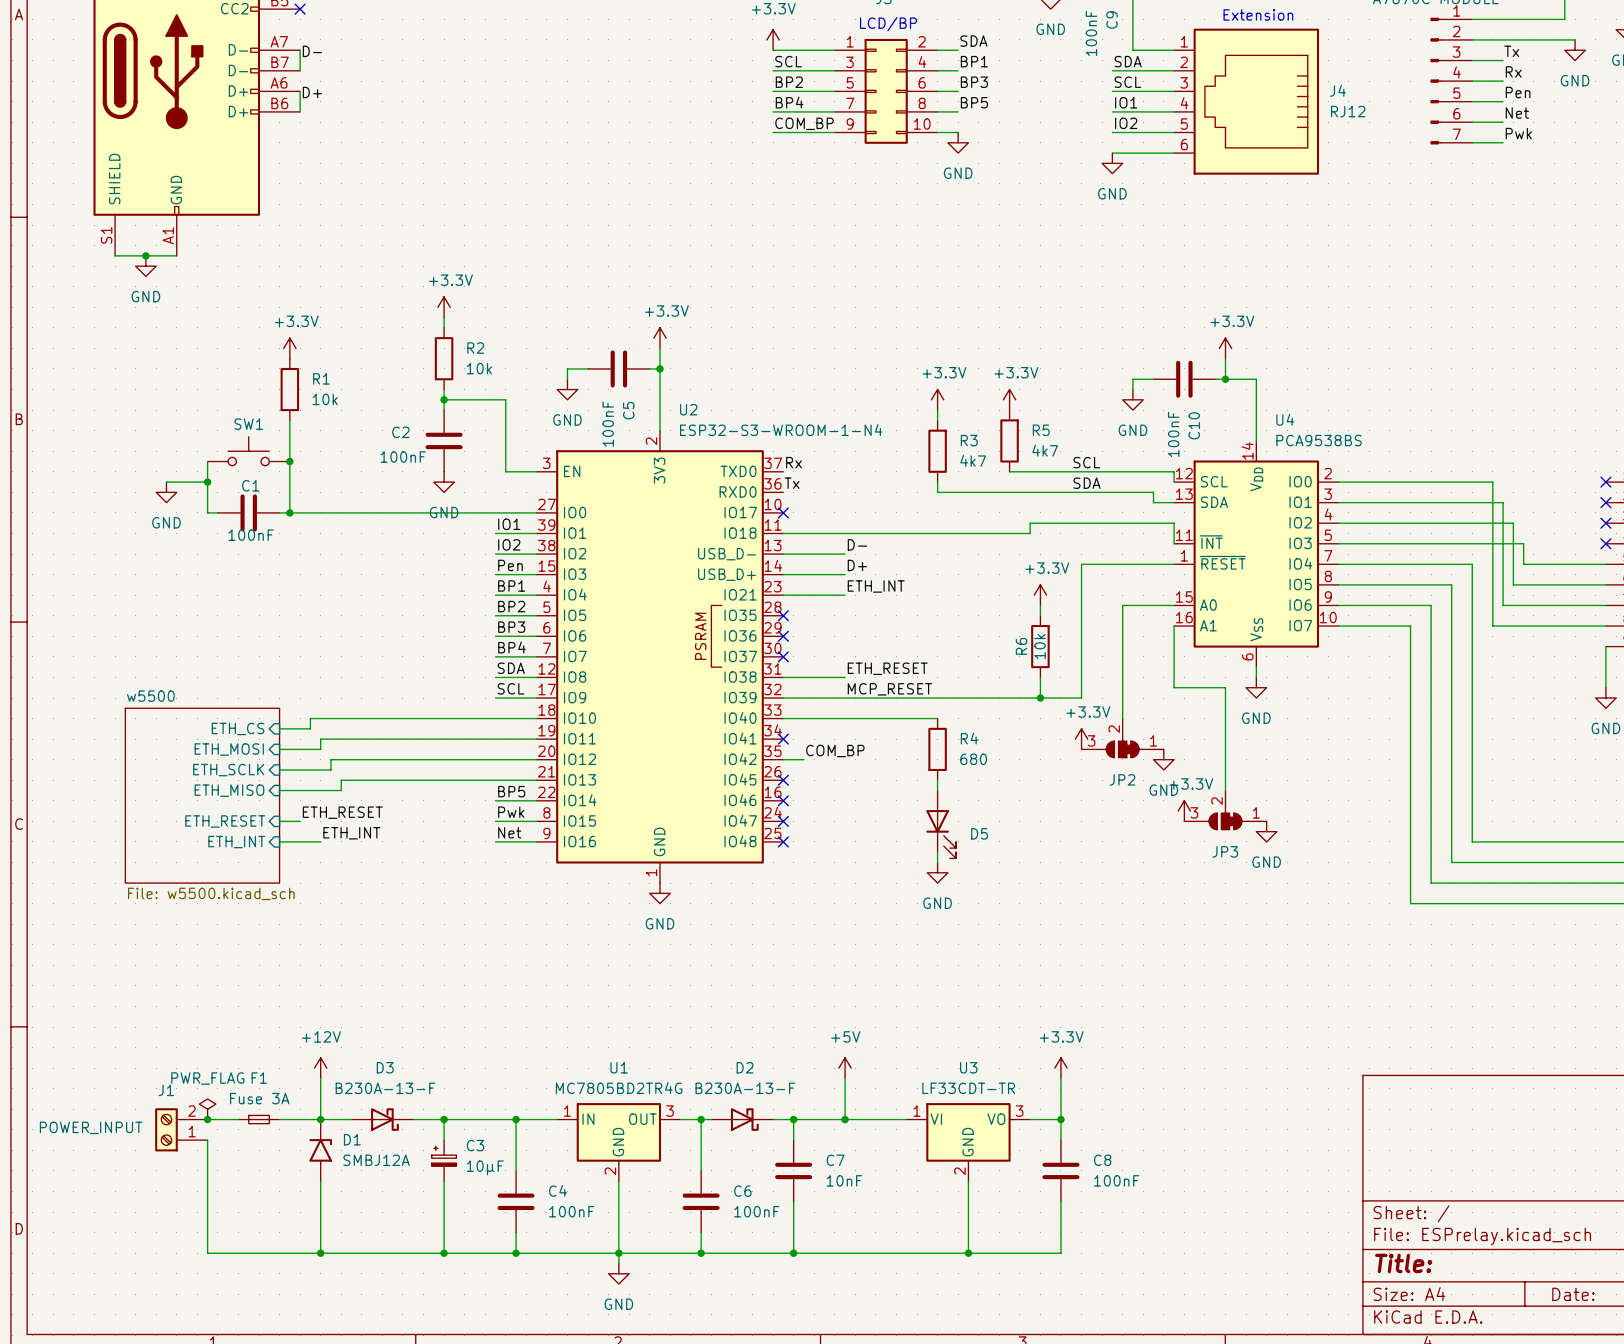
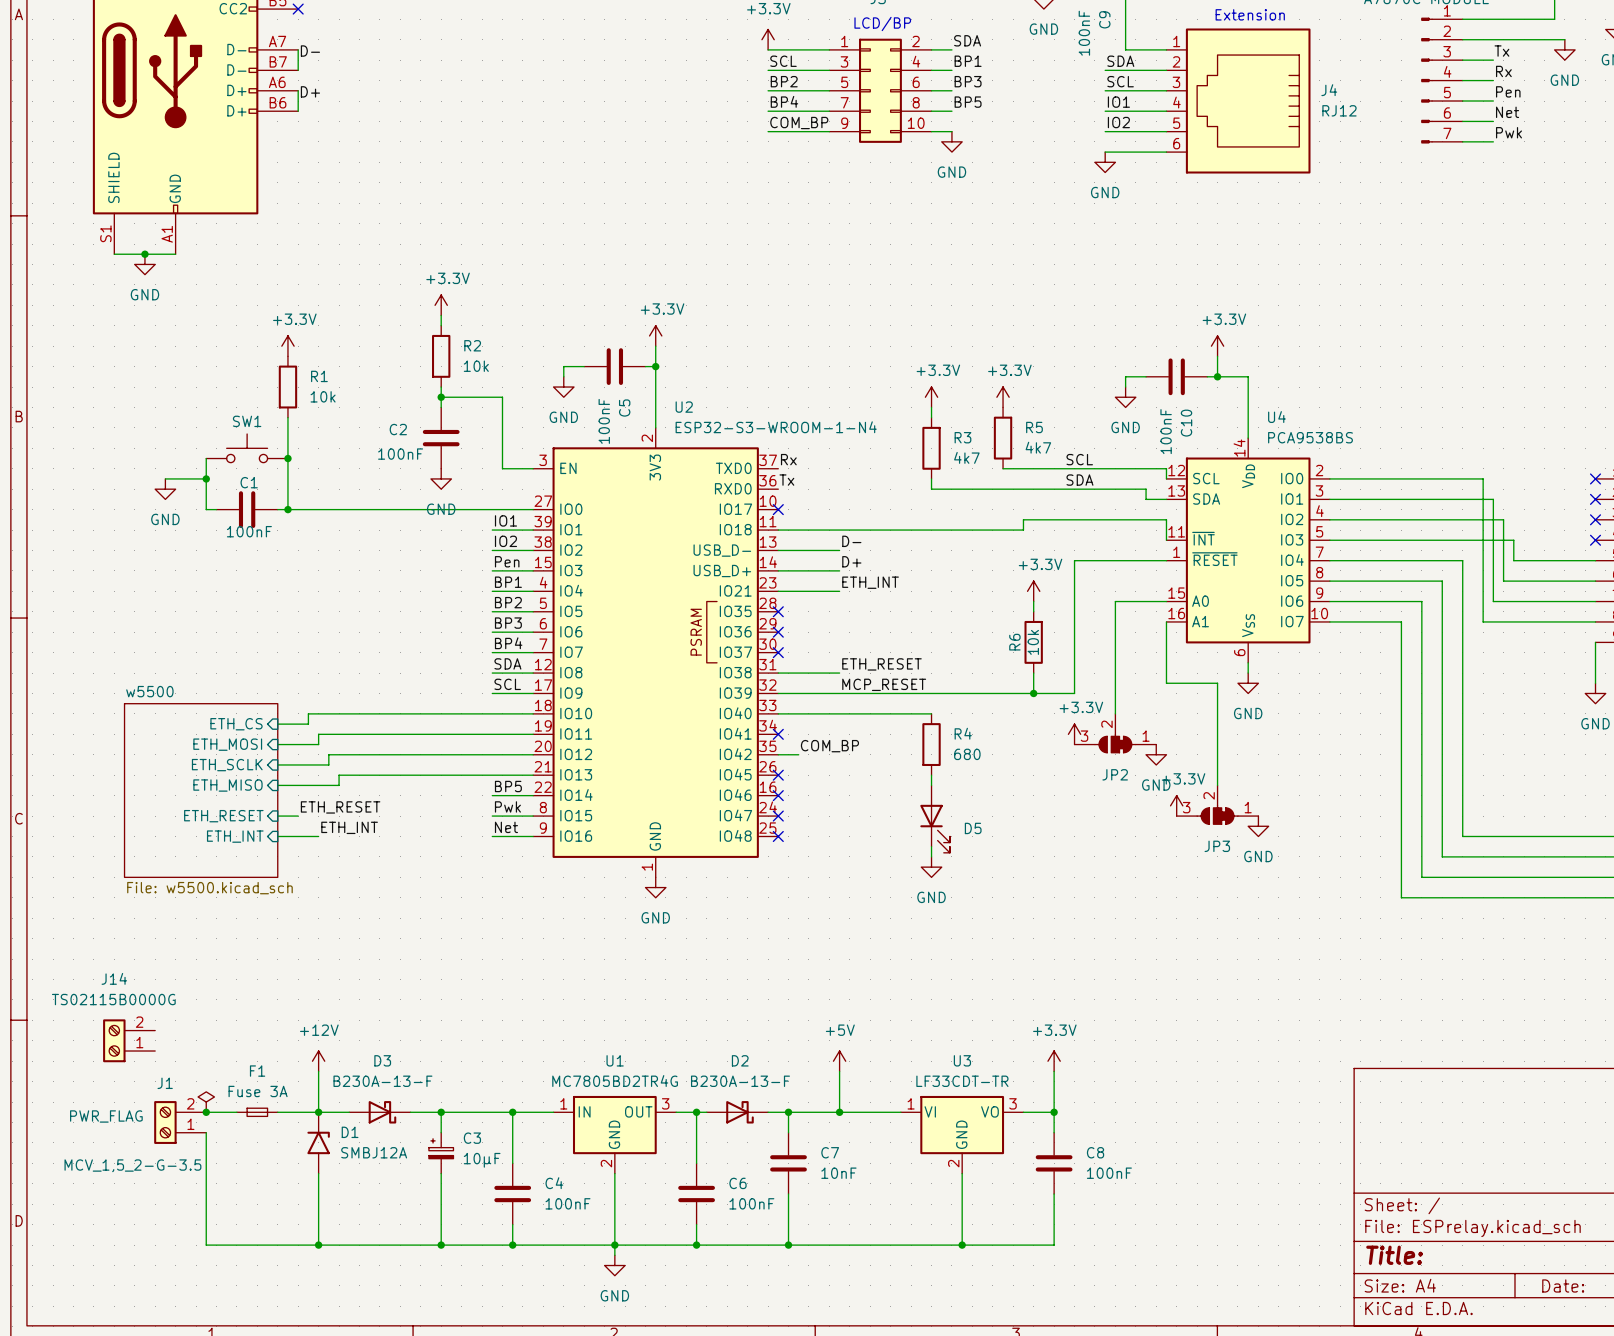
J14: none -> TS02115B0000G (129, 1040)
power symbol text position: PWR_FLAG (207, 1078) -> PWR_FLAG (106, 1116)
J1 value: POWER_INPUT (91, 1127) -> MCV_1,5_2-G-3.5 (132, 1165)

